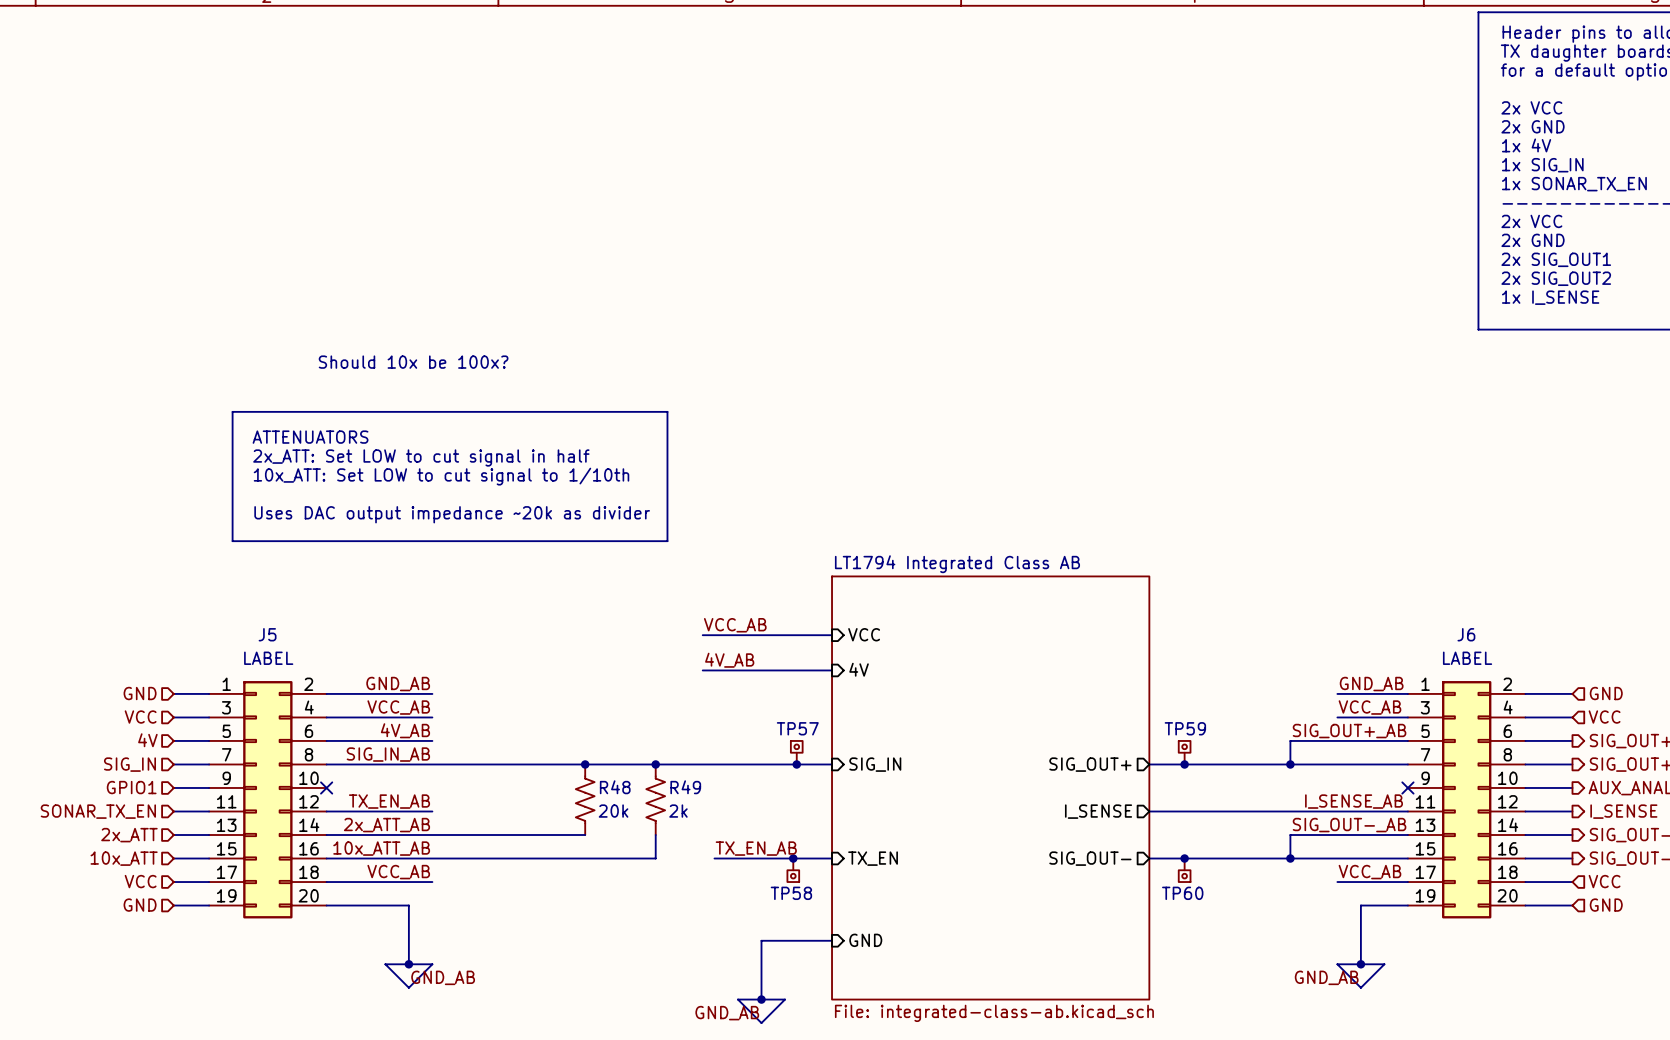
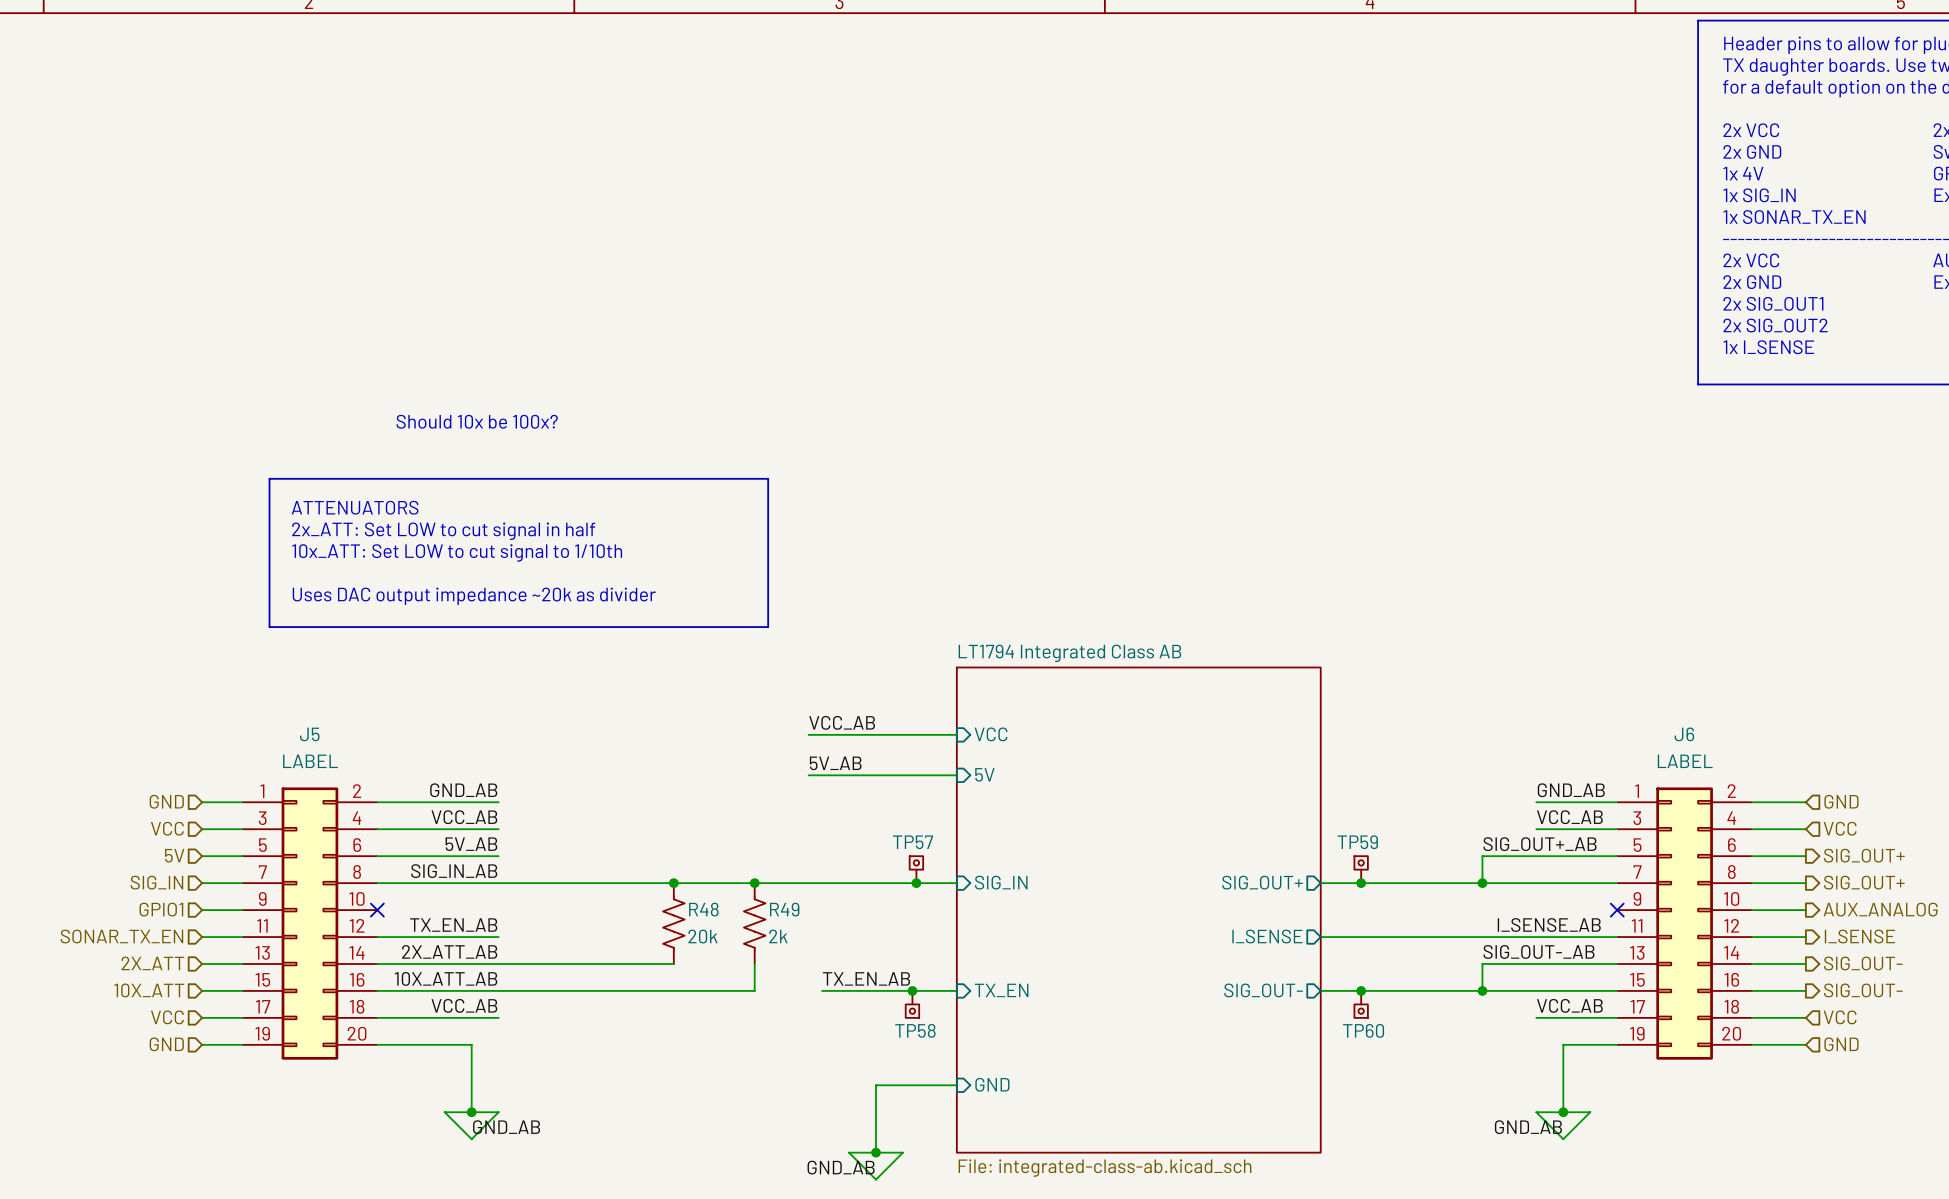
label: 4V_AB (729, 660) -> 5V_AB (835, 763)
sheet pin: 4V (859, 669) -> 5V (984, 774)
label: 4V_AB (405, 730) -> 5V_AB (471, 844)
hierarchical label: 4V (147, 740) -> 5V (174, 855)
label: 2x_ATT_AB (386, 825) -> 2X_ATT_AB (449, 951)
hierarchical label: 2x_ATT (129, 835) -> 2X_ATT (152, 963)
label: 10x_ATT_AB (381, 848) -> 10X_ATT_AB (446, 978)
hierarchical label: 10x_ATT (124, 858) -> 10X_ATT (149, 990)

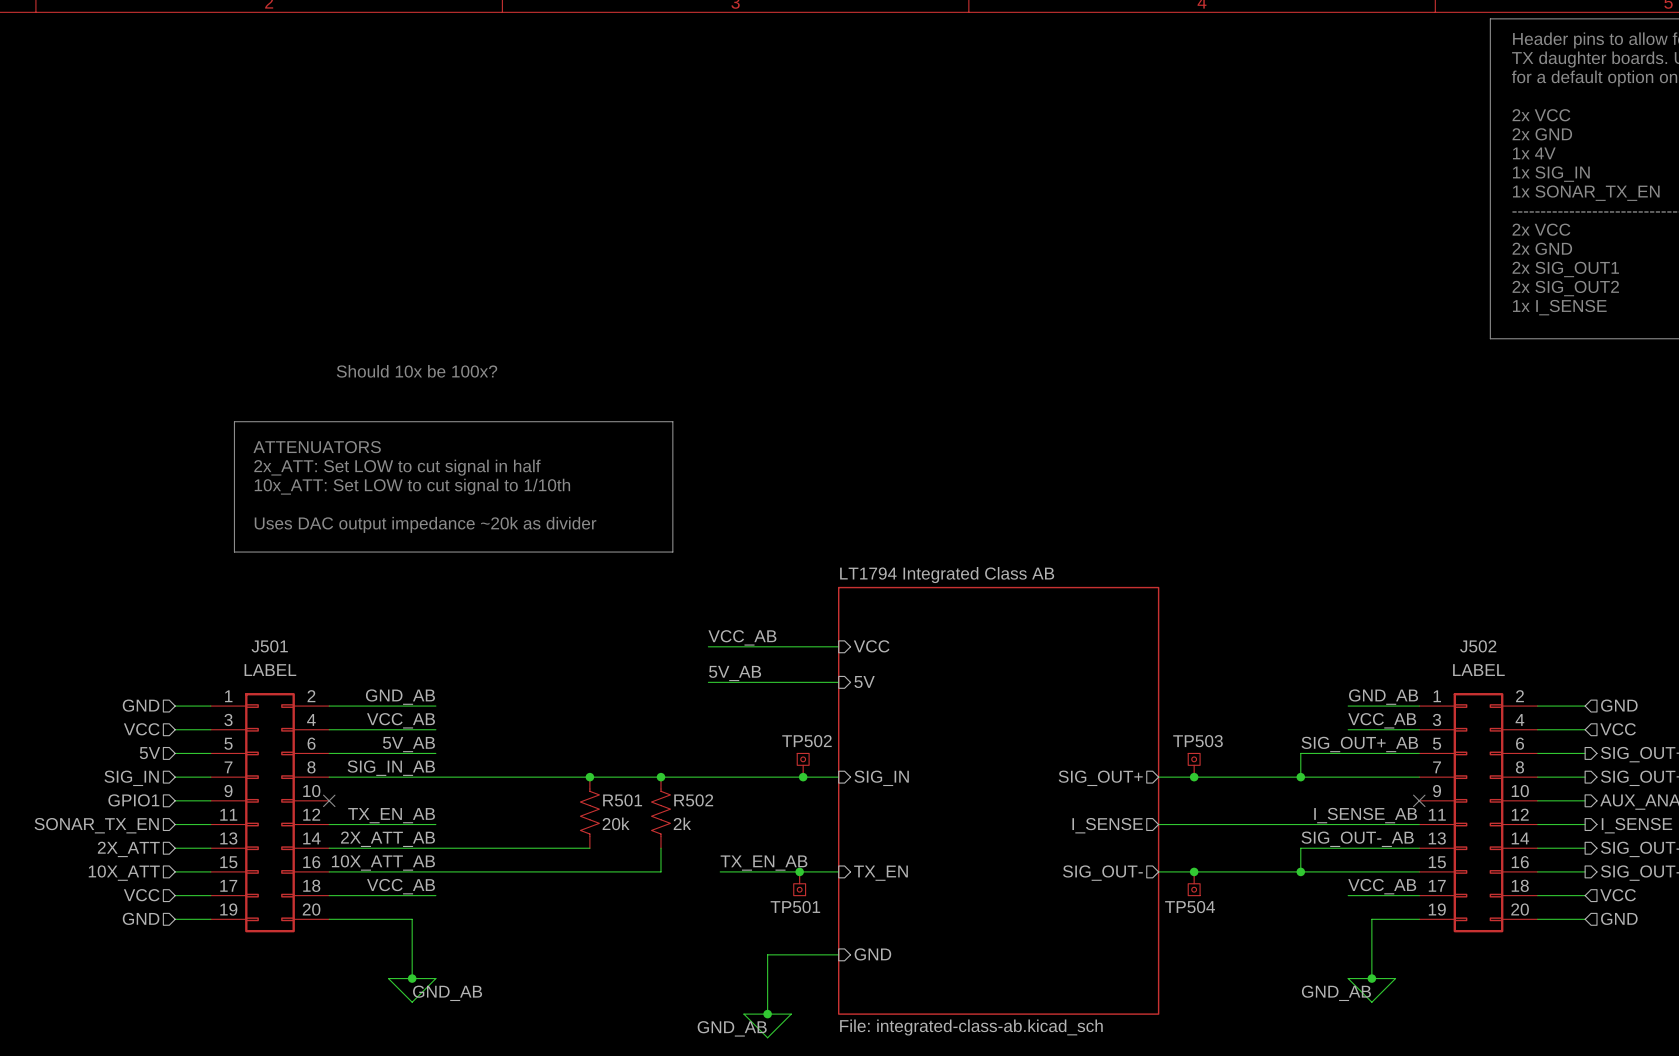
J5 name: J5 (309, 734) -> J501 (269, 646)
J6 name: J6 (1684, 734) -> J502 (1478, 646)
TP57 name: TP57 (913, 842) -> TP502 (806, 741)
TP59 name: TP59 (1357, 842) -> TP503 (1198, 741)
R48 name: R48 (703, 909) -> R501 (622, 800)
R49 name: R49 (784, 909) -> R502 (693, 800)
TP58 name: TP58 (915, 1030) -> TP501 (795, 907)
TP60 name: TP60 (1363, 1030) -> TP504 (1190, 907)

